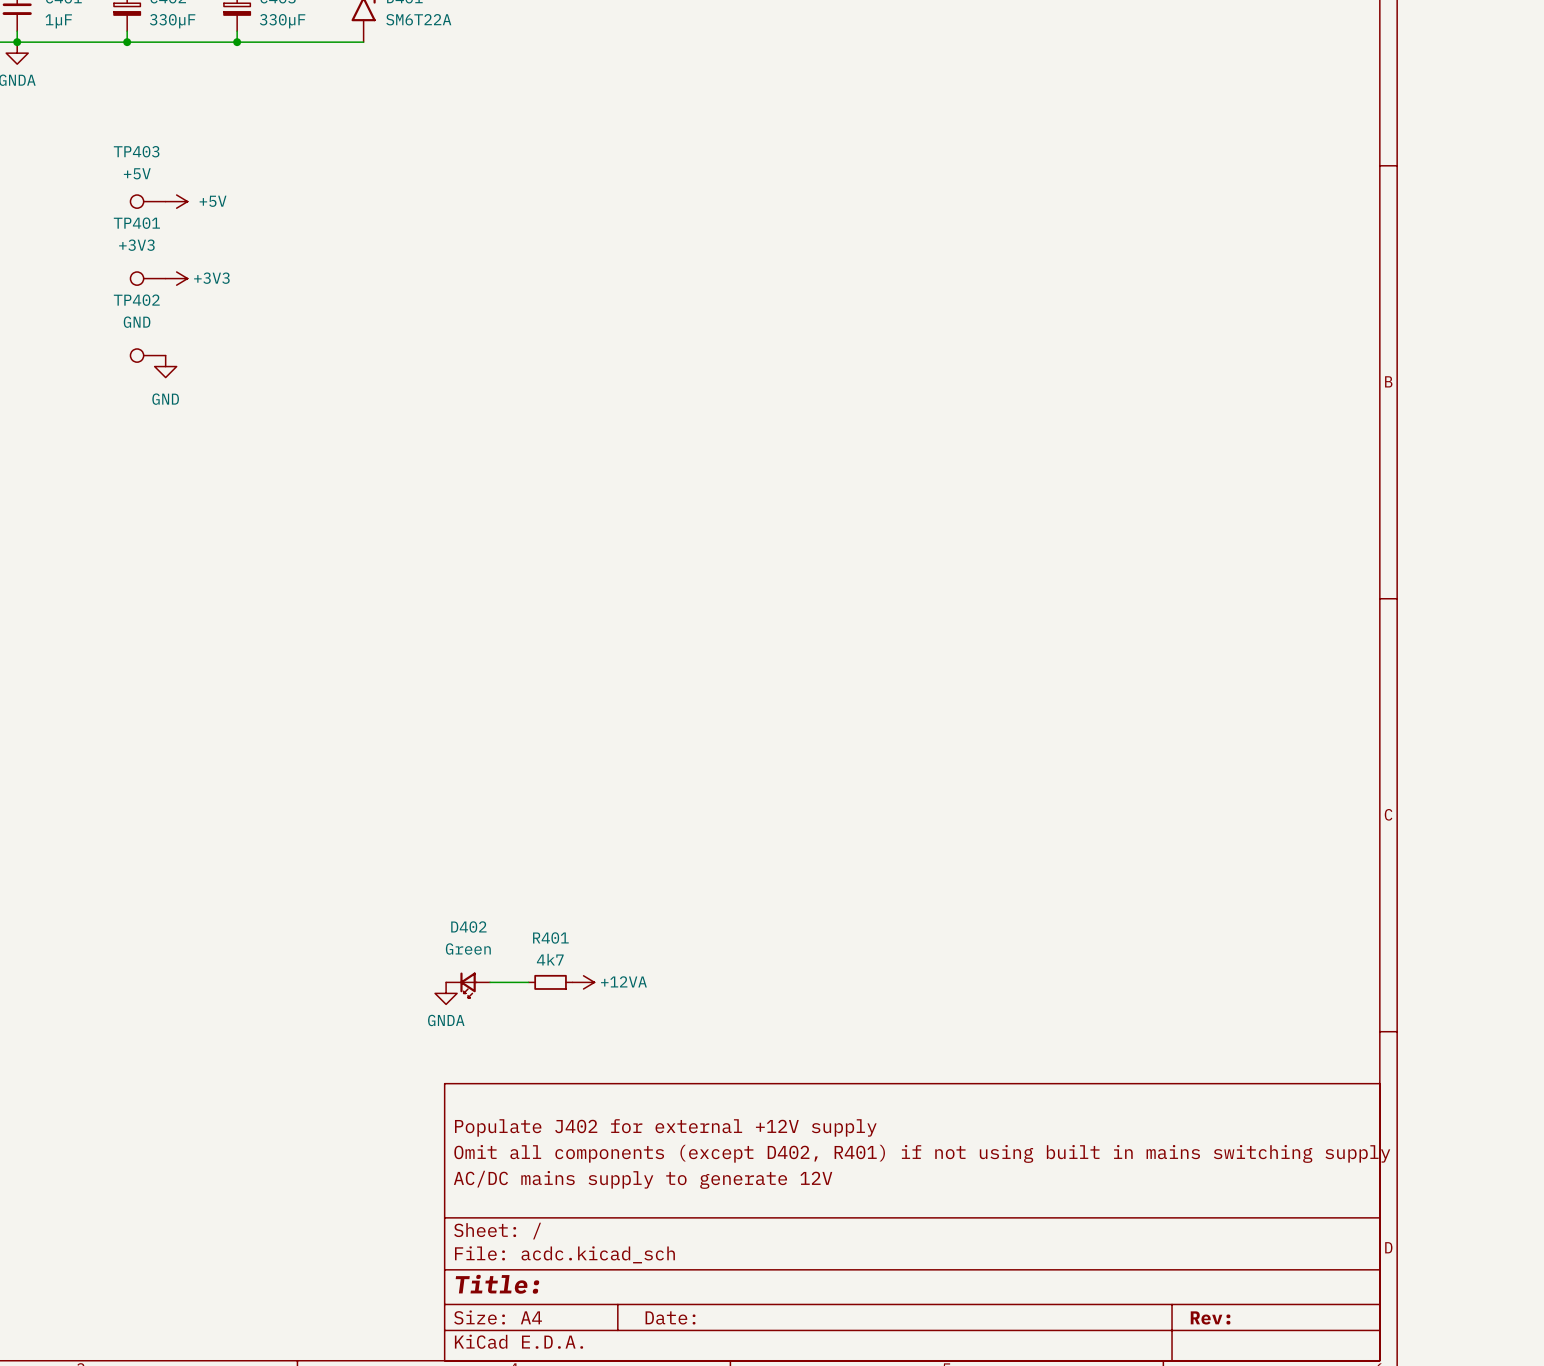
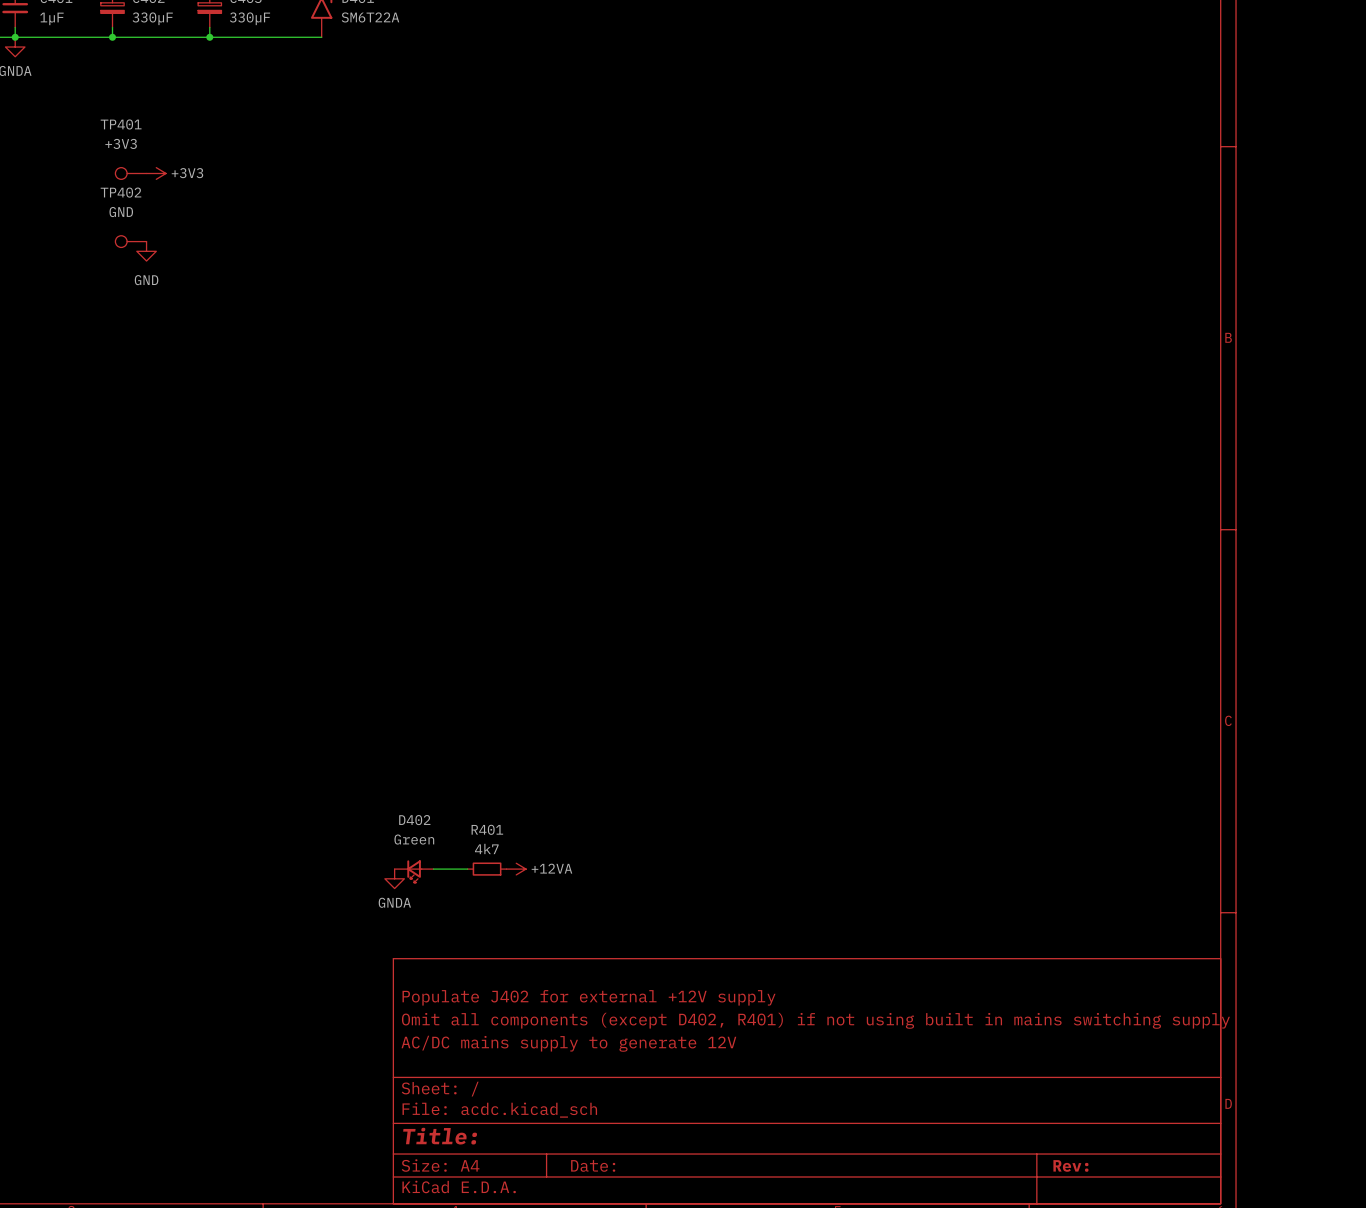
TP403: +5V (148, 201) -> none
power symbol: +5V (176, 201) -> +3V3 (156, 173)
TP401 position: (148, 278) -> (130, 173)
power symbol: +3V3 (176, 278) -> none
TP402 position: (148, 355) -> (130, 241)
power symbol position: GND (165, 366) -> GND (146, 251)

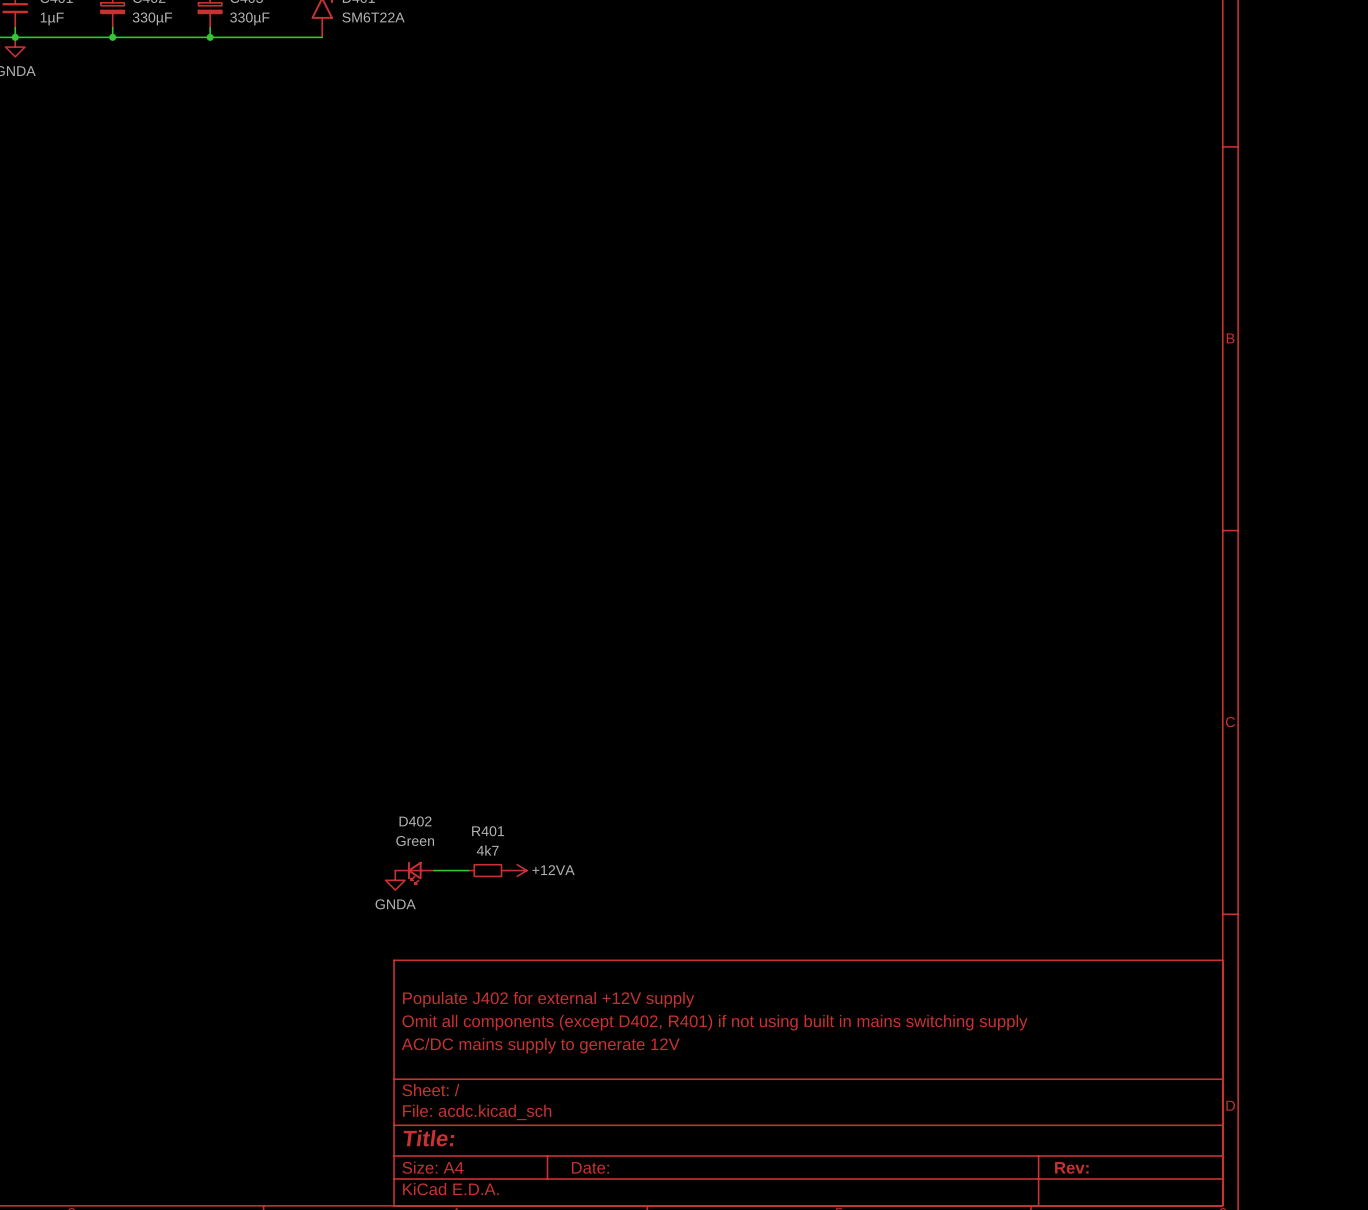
TP401: +3V3 (130, 173) -> none
power symbol: +3V3 (156, 173) -> none
TP402: GND (130, 241) -> none
power symbol: GND (146, 251) -> none

